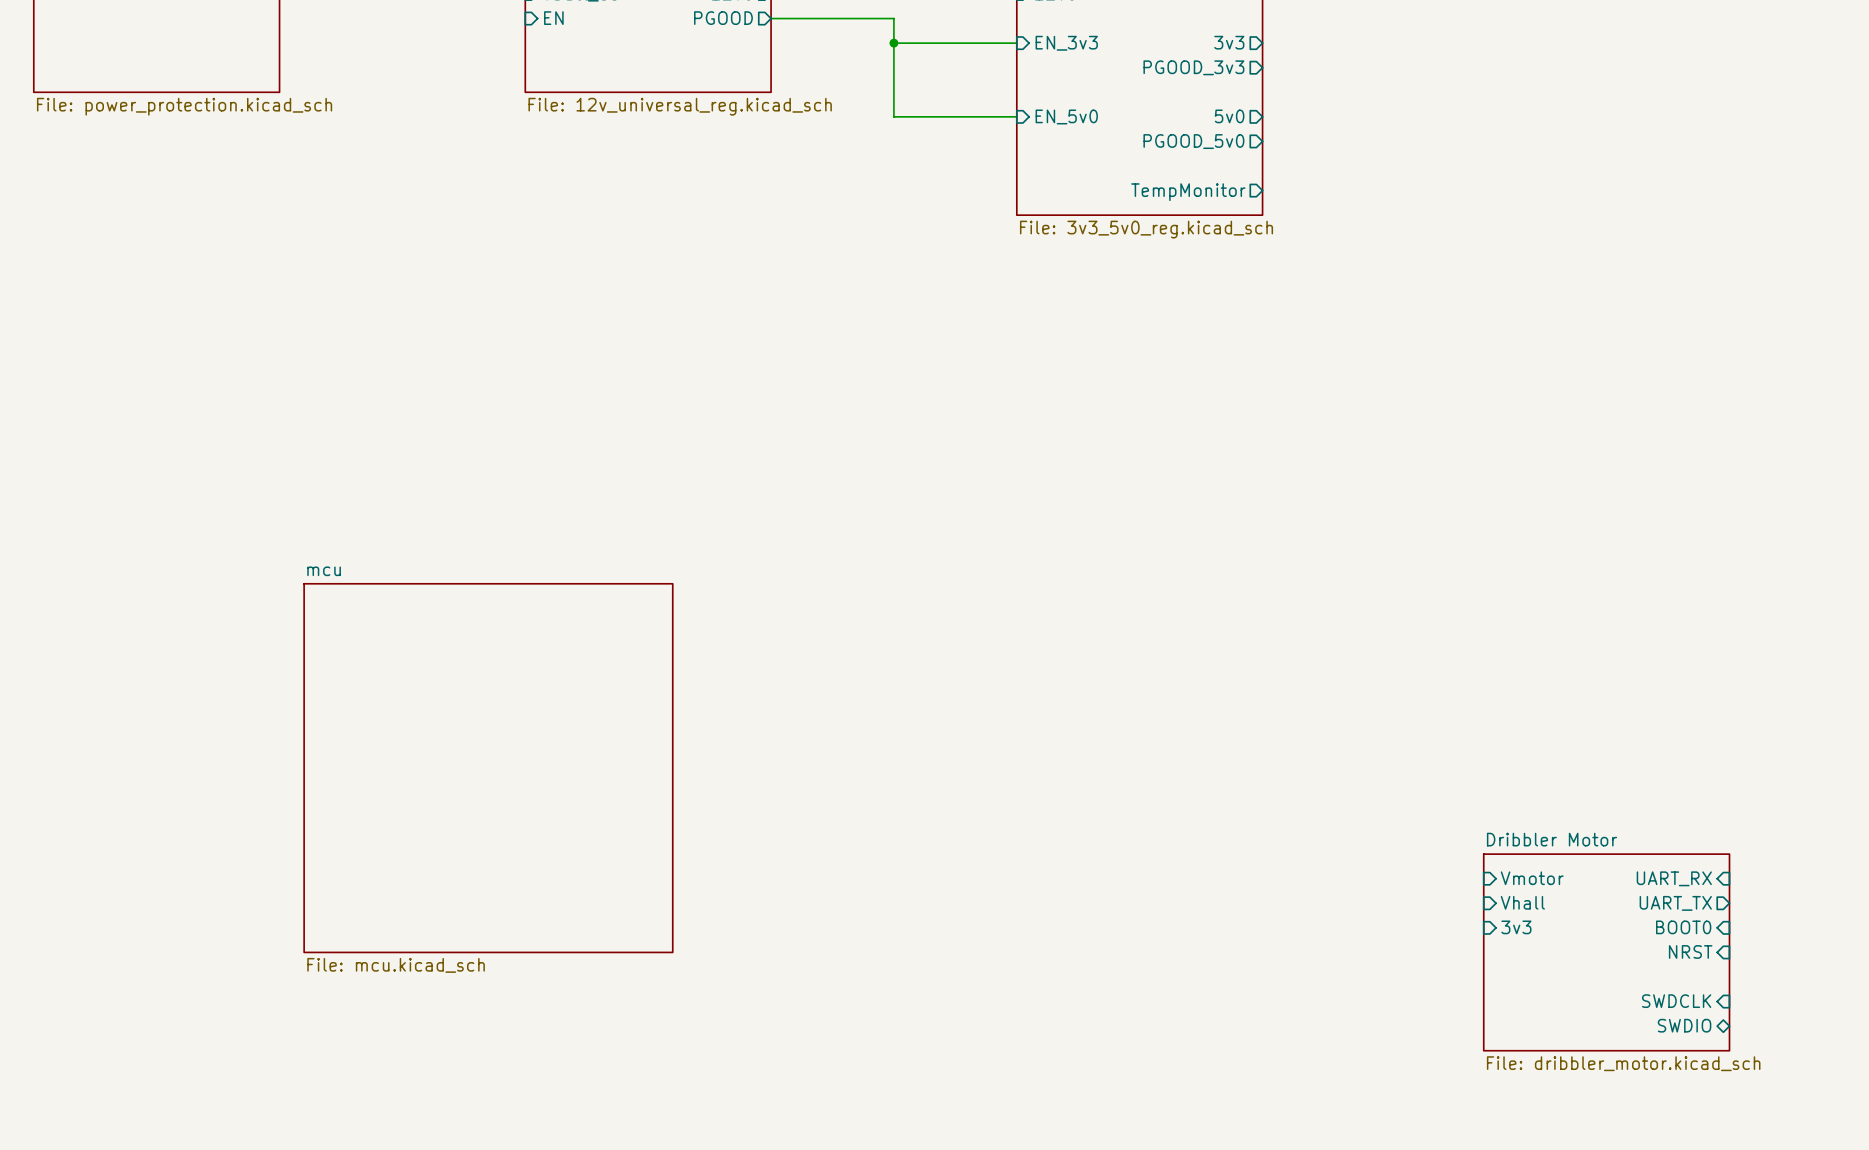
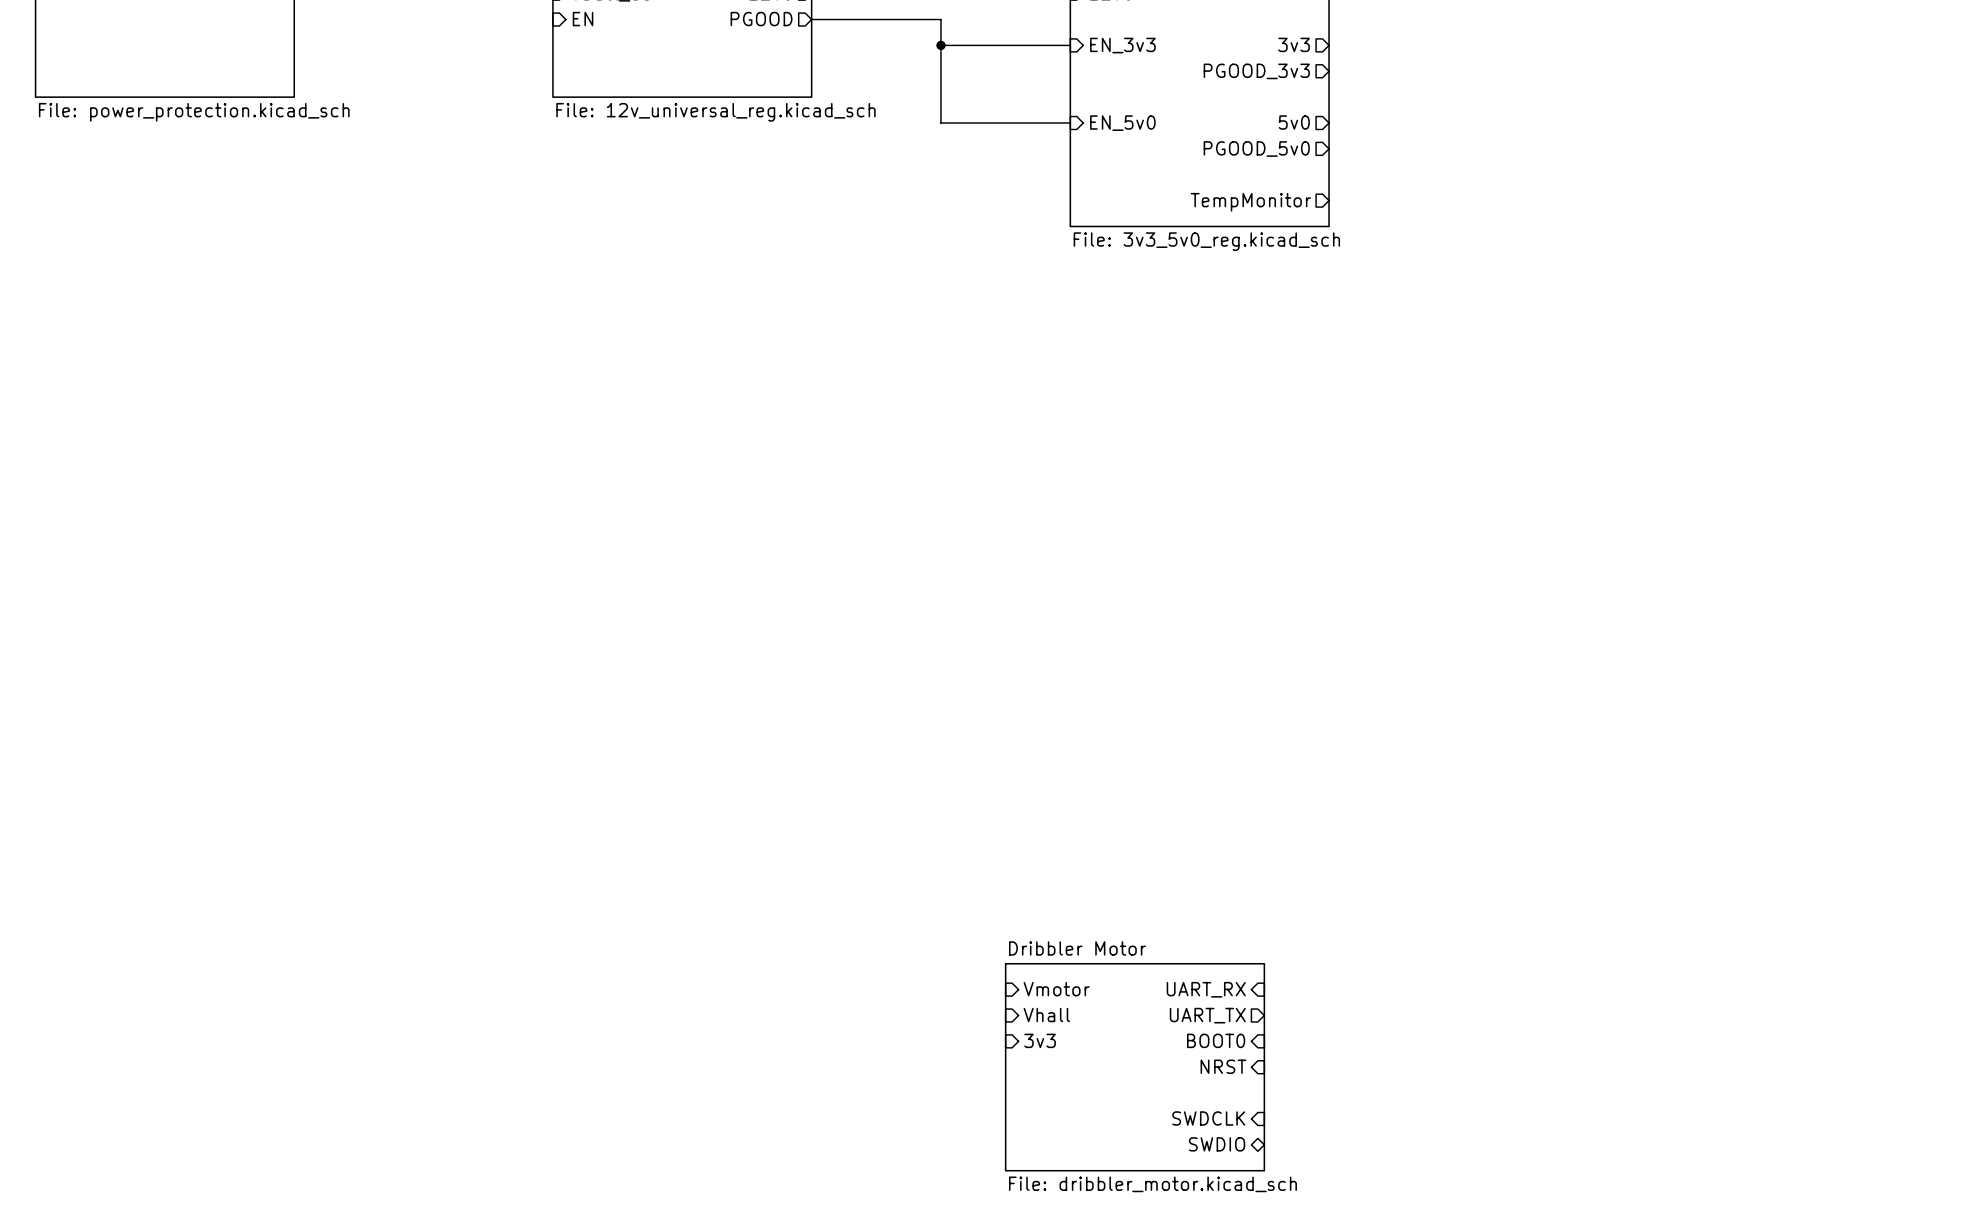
sheet mcu: File: mcu.kicad_sch (488, 768) -> none
sheet pin: Vmotor (1532, 878) -> none
sheet pin: UART_RX (1674, 878) -> none
sheet pin: Vhall (1522, 902) -> none
sheet pin: UART_TX (1675, 903) -> none
sheet pin: 3v3 (1516, 927) -> none
sheet pin: BOOT0 (1683, 927) -> none
sheet pin: none -> Vmotor (1056, 989)
sheet pin: none -> UART_RX (1206, 989)
sheet pin: NRST (1690, 951) -> none
sheet Dribbler Motor: File: dribbler_motor.kicad_sch (1606, 952) -> none
sheet pin: none -> Vhall (1046, 1015)
sheet pin: none -> UART_TX (1207, 1015)
sheet pin: none -> 3v3 (1040, 1040)
sheet pin: none -> BOOT0 (1216, 1040)
sheet pin: SWDCLK (1676, 1001) -> none
sheet Dribbler Motor: none -> File: dribbler_motor.kicad_sch (1135, 1067)
sheet pin: none -> NRST (1223, 1066)
sheet pin: SWDIO (1684, 1025) -> none
sheet pin: none -> SWDCLK (1208, 1118)
sheet pin: none -> SWDIO (1217, 1144)

